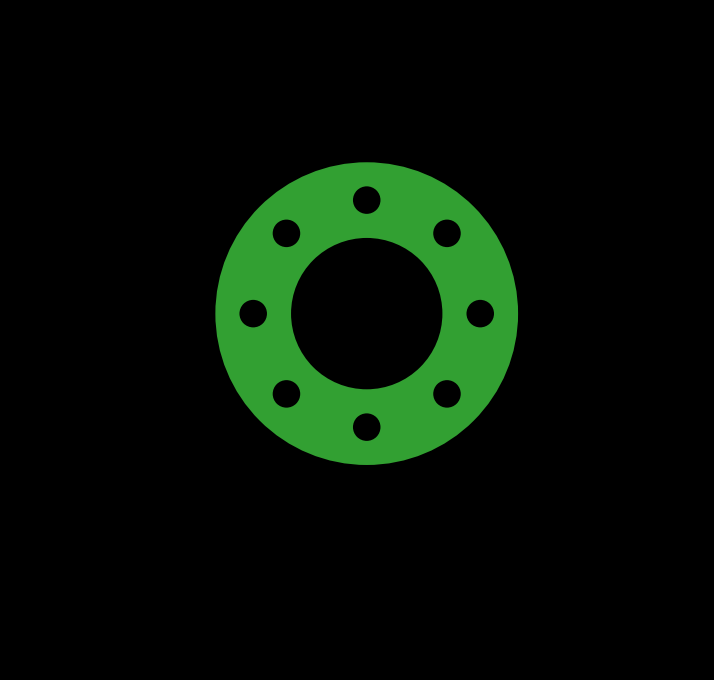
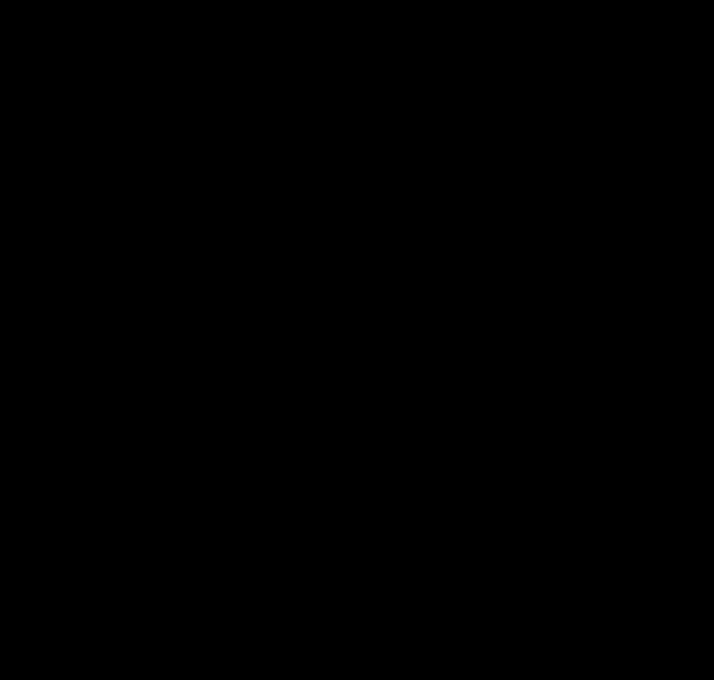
part: (366, 313) -> none

